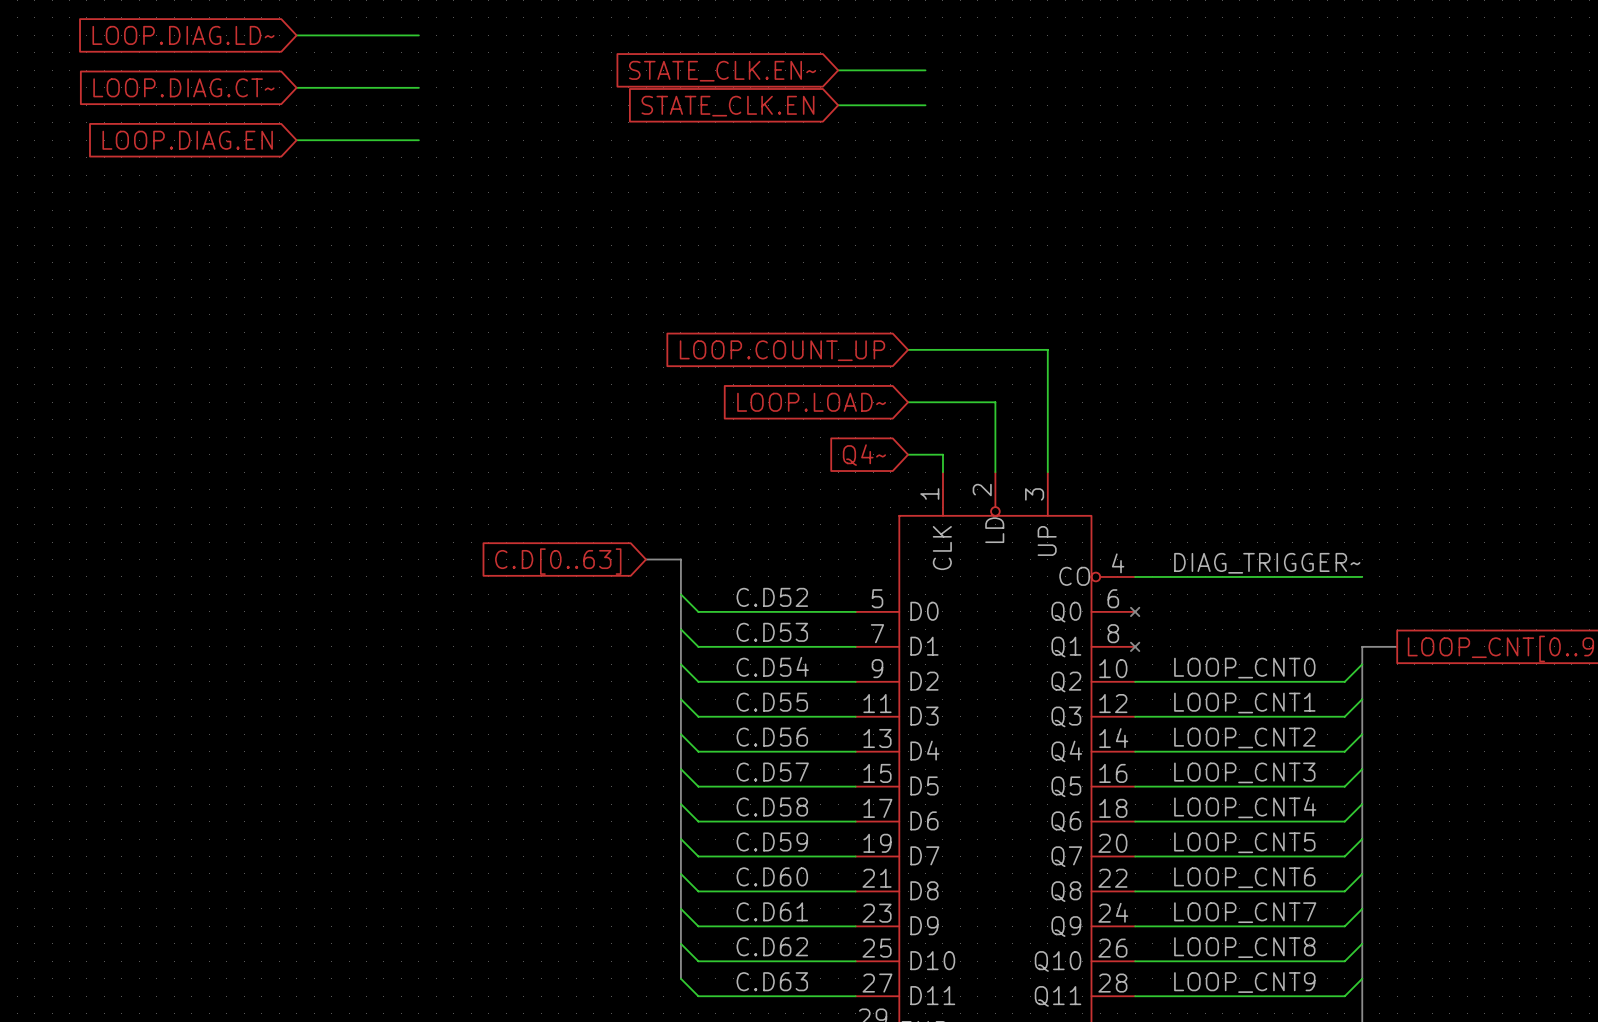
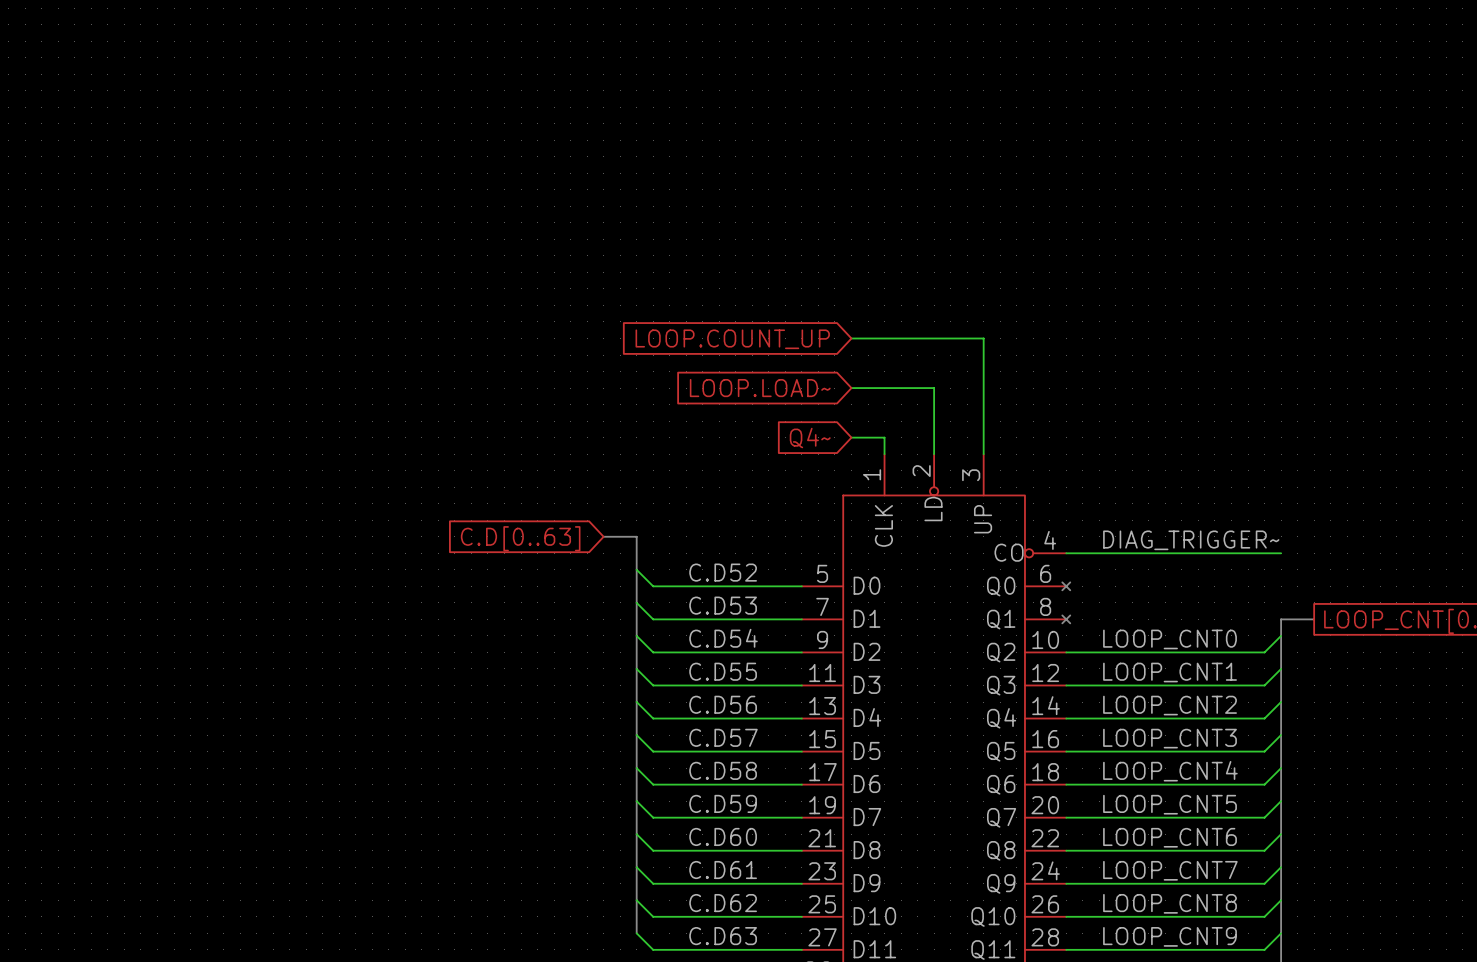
global label: LOOP.DIAG.LD~ (183, 35) -> none
wire: (296, 35) (418, 35) -> none
wire: (838, 70) (925, 70) -> none
global label: STATE_CLK.EN~ (722, 71) -> none
global label: LOOP.DIAG.CT~ (183, 87) -> none
wire: (296, 87) (418, 87) -> none
wire: (838, 105) (925, 105) -> none
global label: STATE_CLK.EN (727, 106) -> none
global label: LOOP.DIAG.EN (187, 140) -> none
wire: (296, 140) (418, 140) -> none

